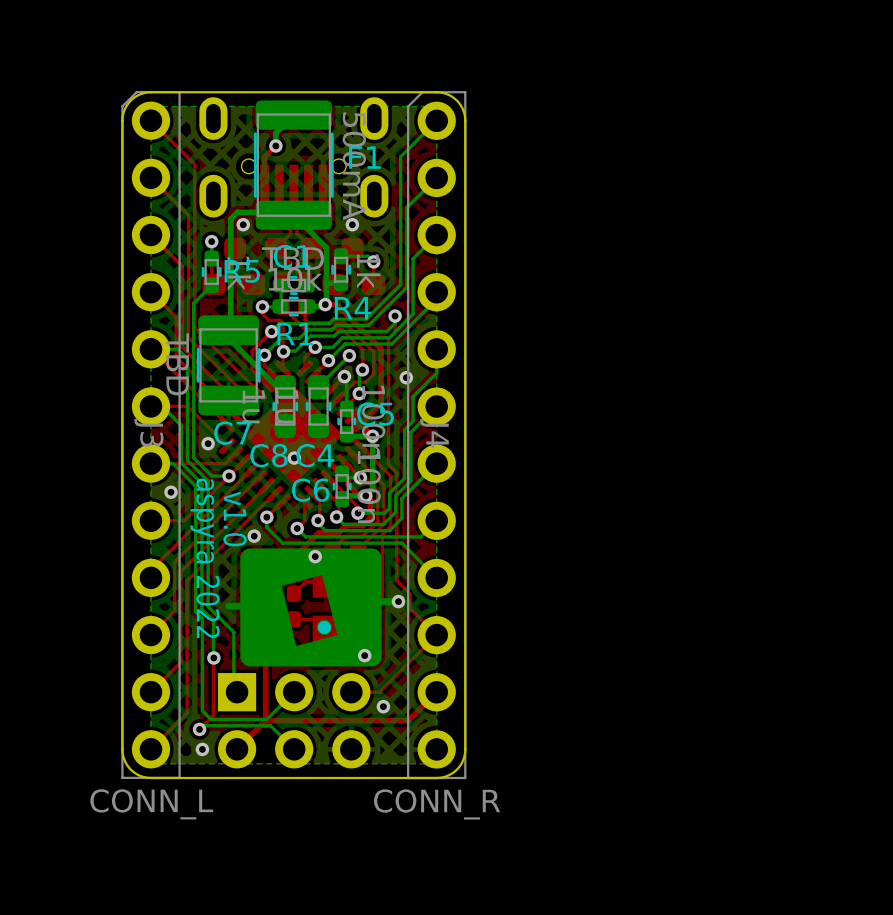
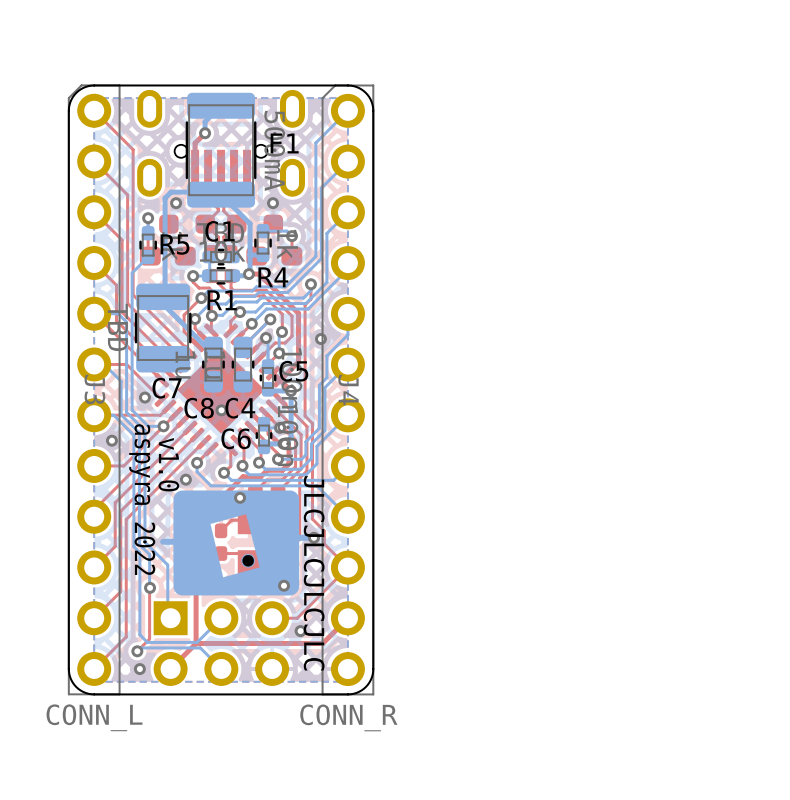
text: none -> JLCJLCJLCJLC (314, 573)

